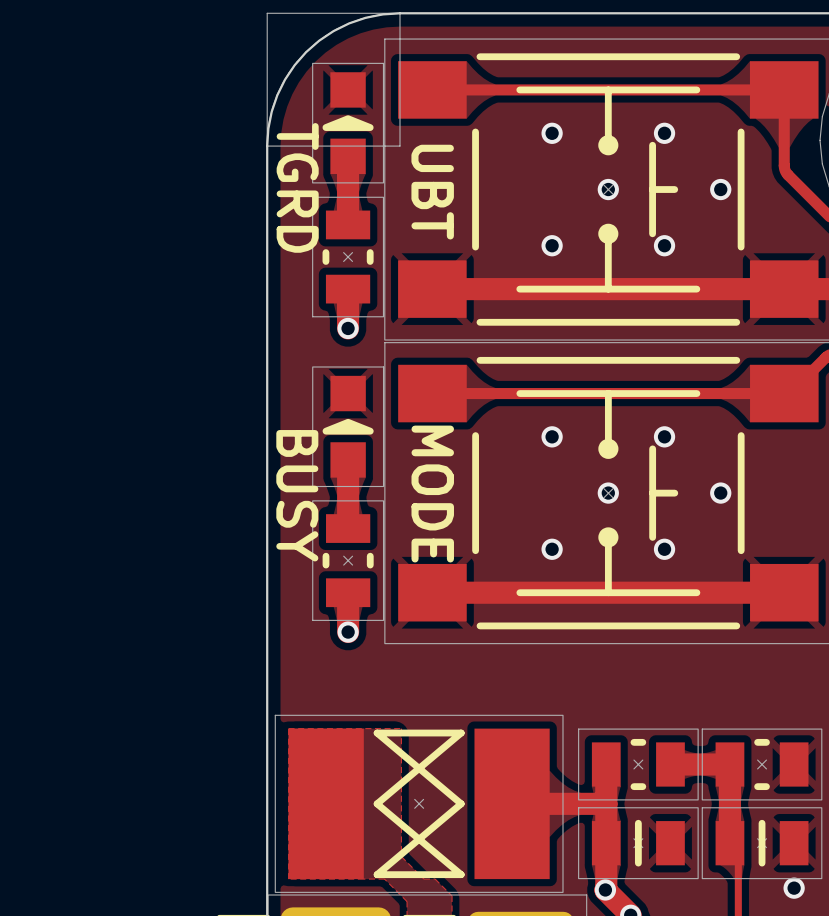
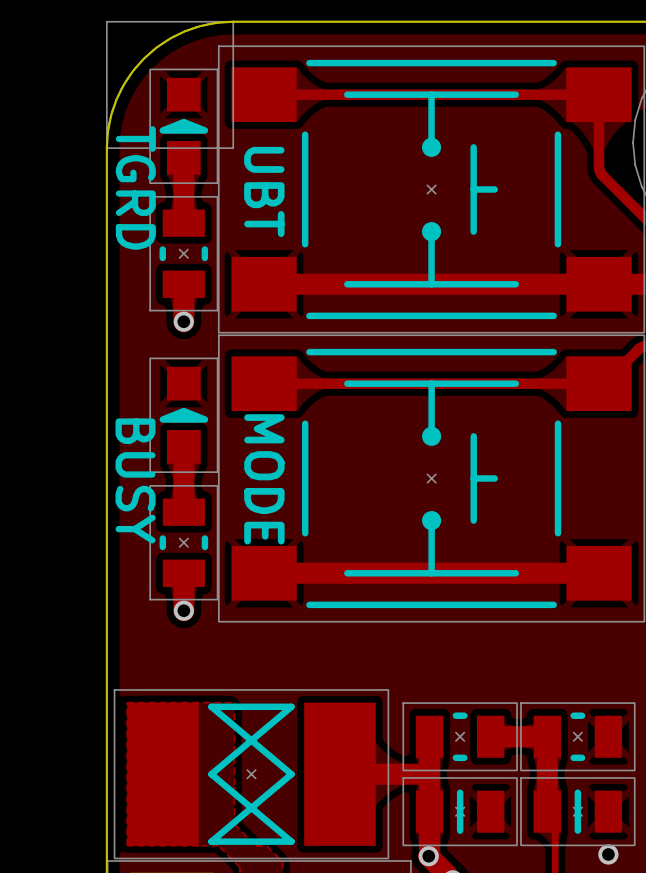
via: (552, 133) -> none
via: (664, 133) -> none
via: (608, 189) -> none
via: (720, 189) -> none
via: (552, 245) -> none
via: (664, 245) -> none
via: (552, 436) -> none
via: (664, 436) -> none
via: (608, 493) -> none
via: (720, 493) -> none
via: (552, 549) -> none
via: (664, 549) -> none

